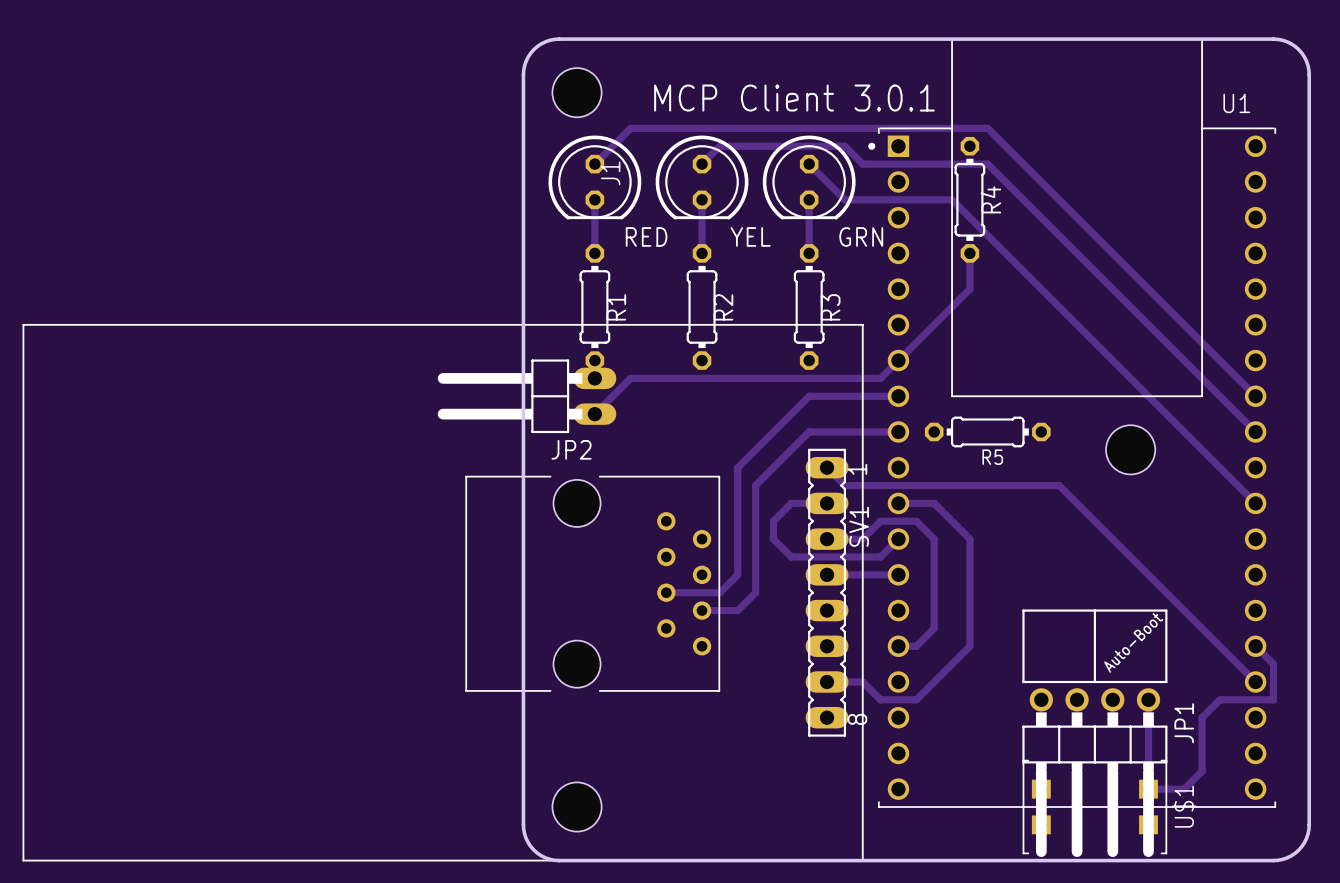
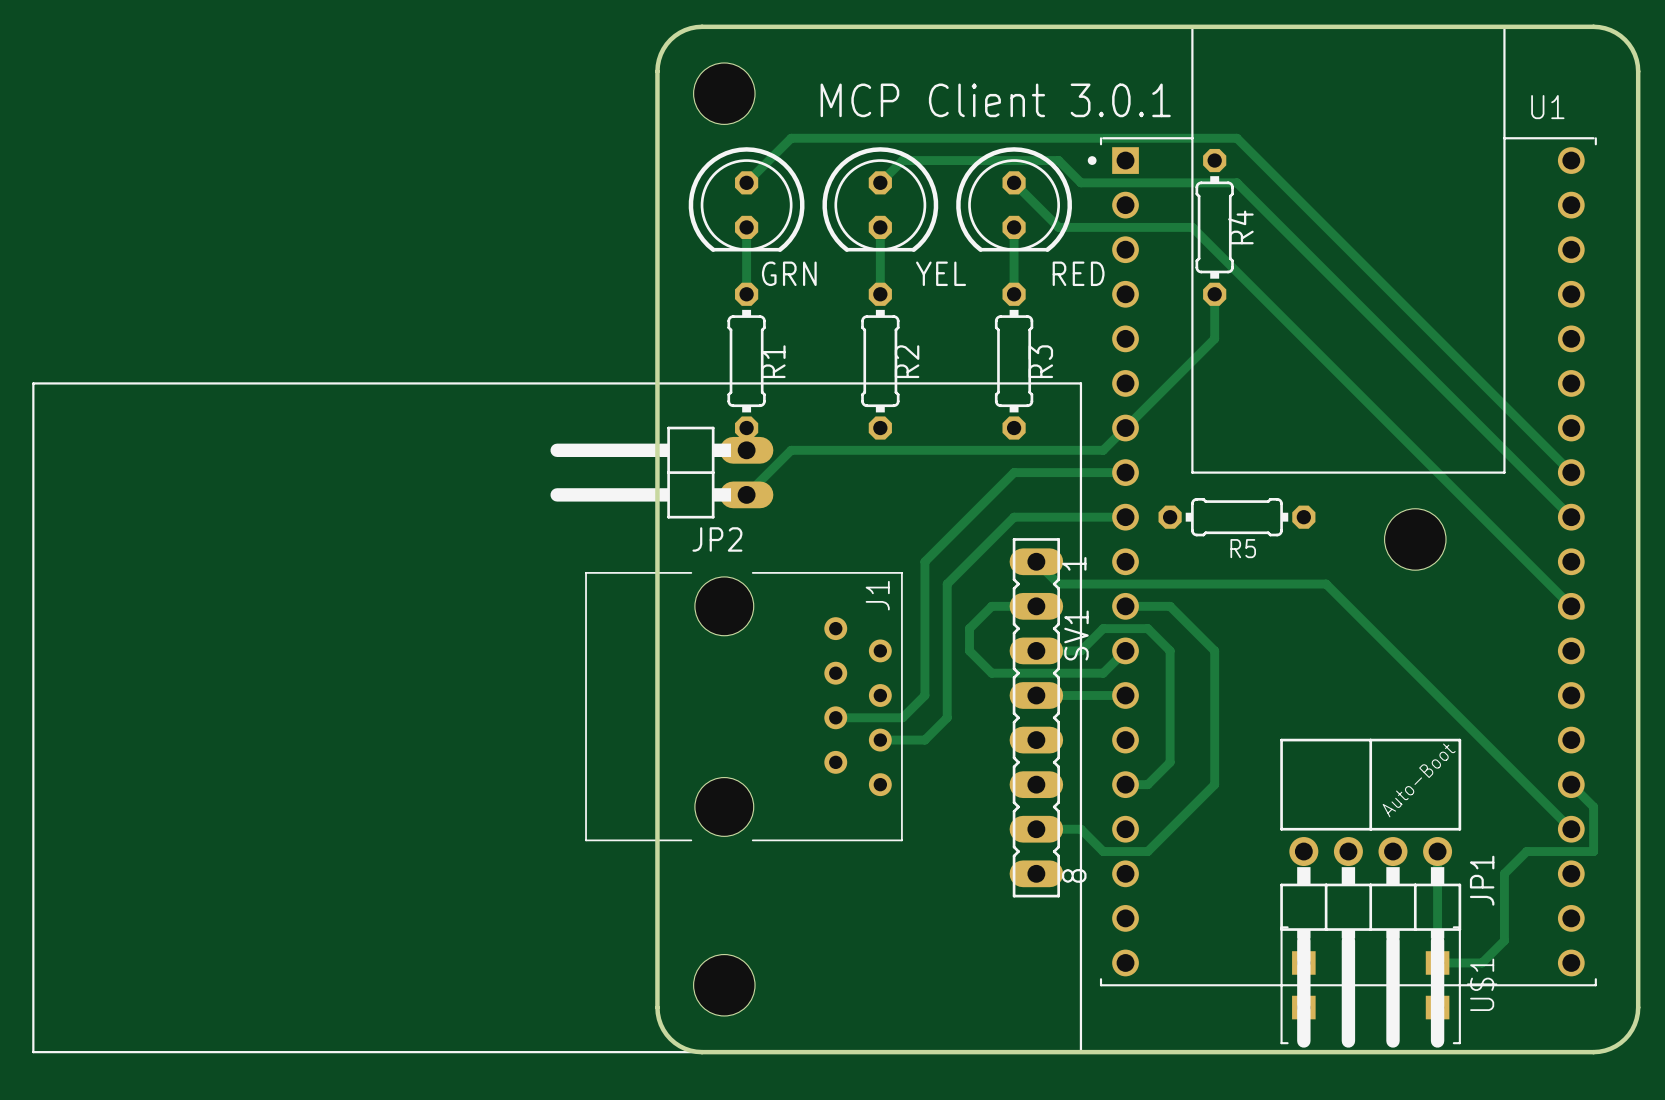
J1 name position: J1 (610, 173) -> J1 (877, 595)
RED name: RED (646, 236) -> GRN (789, 273)
GRN name: GRN (861, 236) -> RED (1078, 273)

